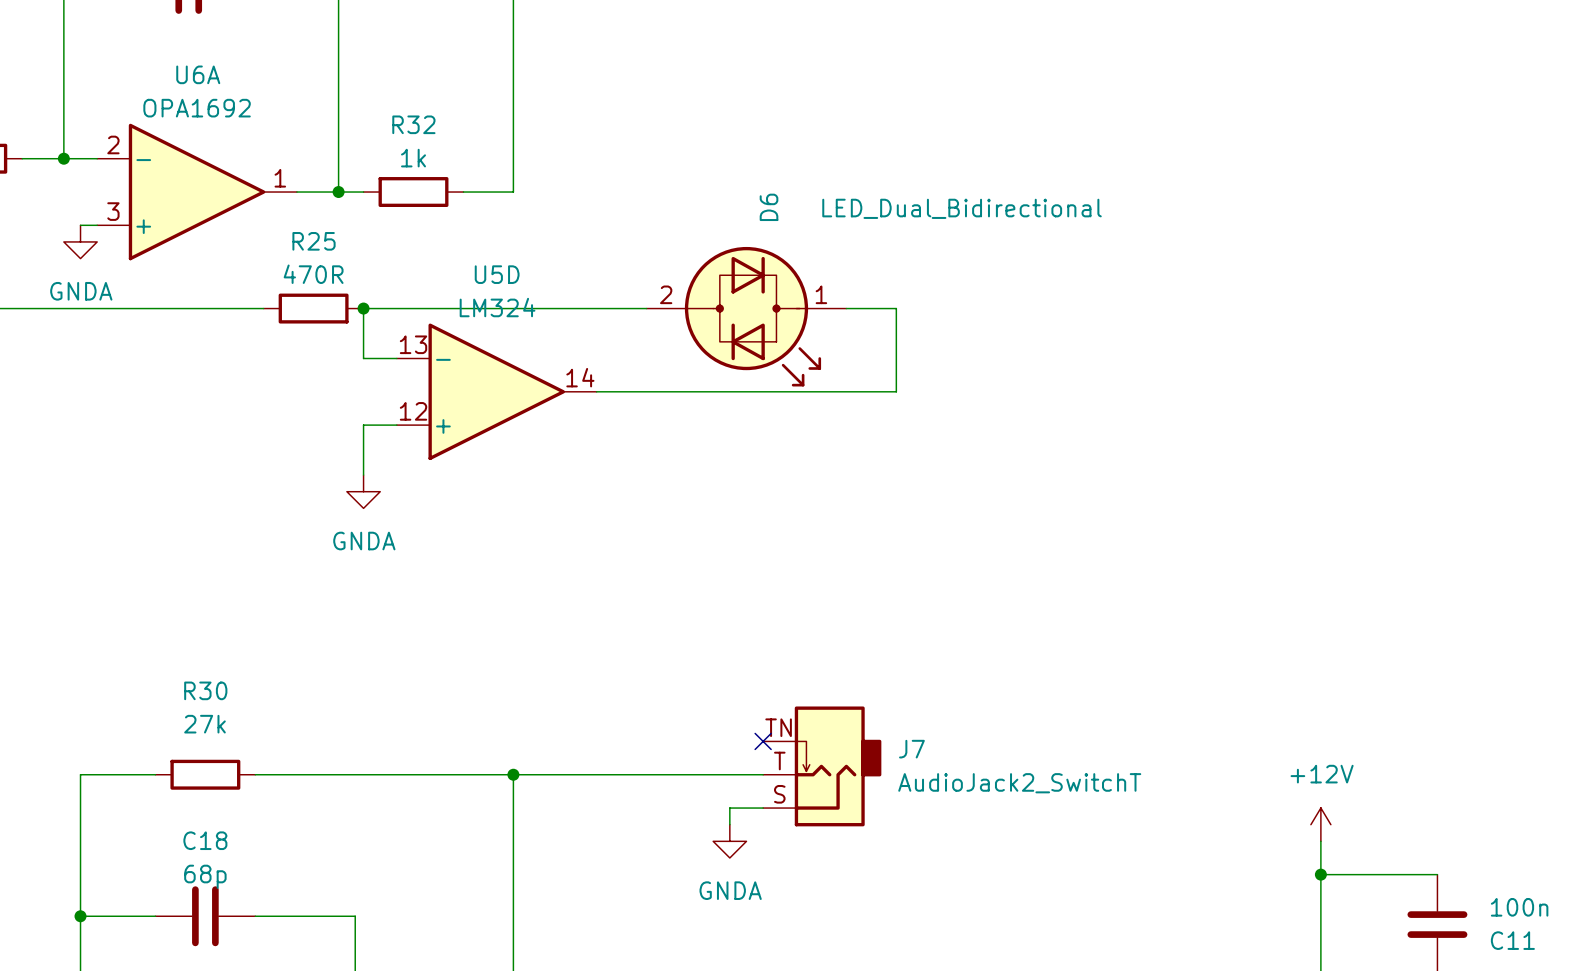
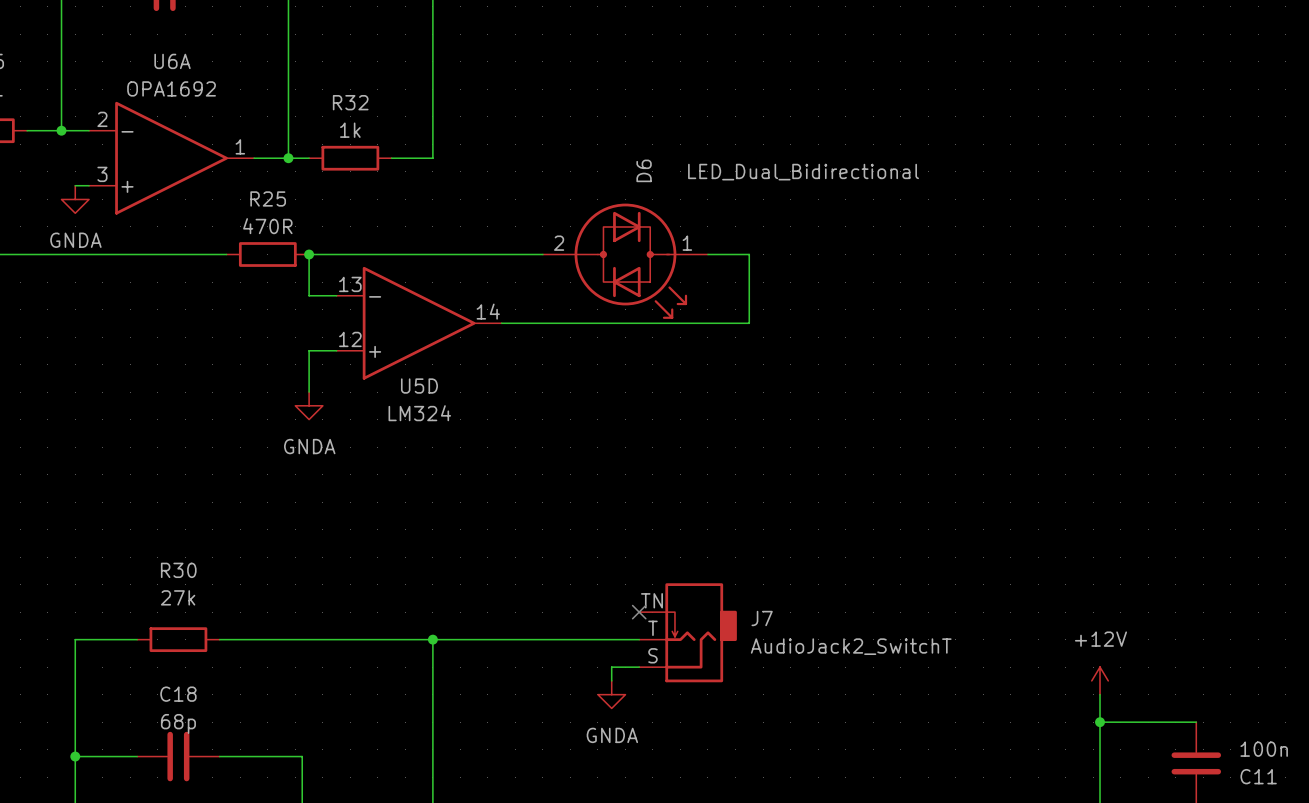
U5D name position: U5D (497, 274) -> U5D (419, 386)
U5D value position: LM324 (497, 307) -> LM324 (419, 413)

